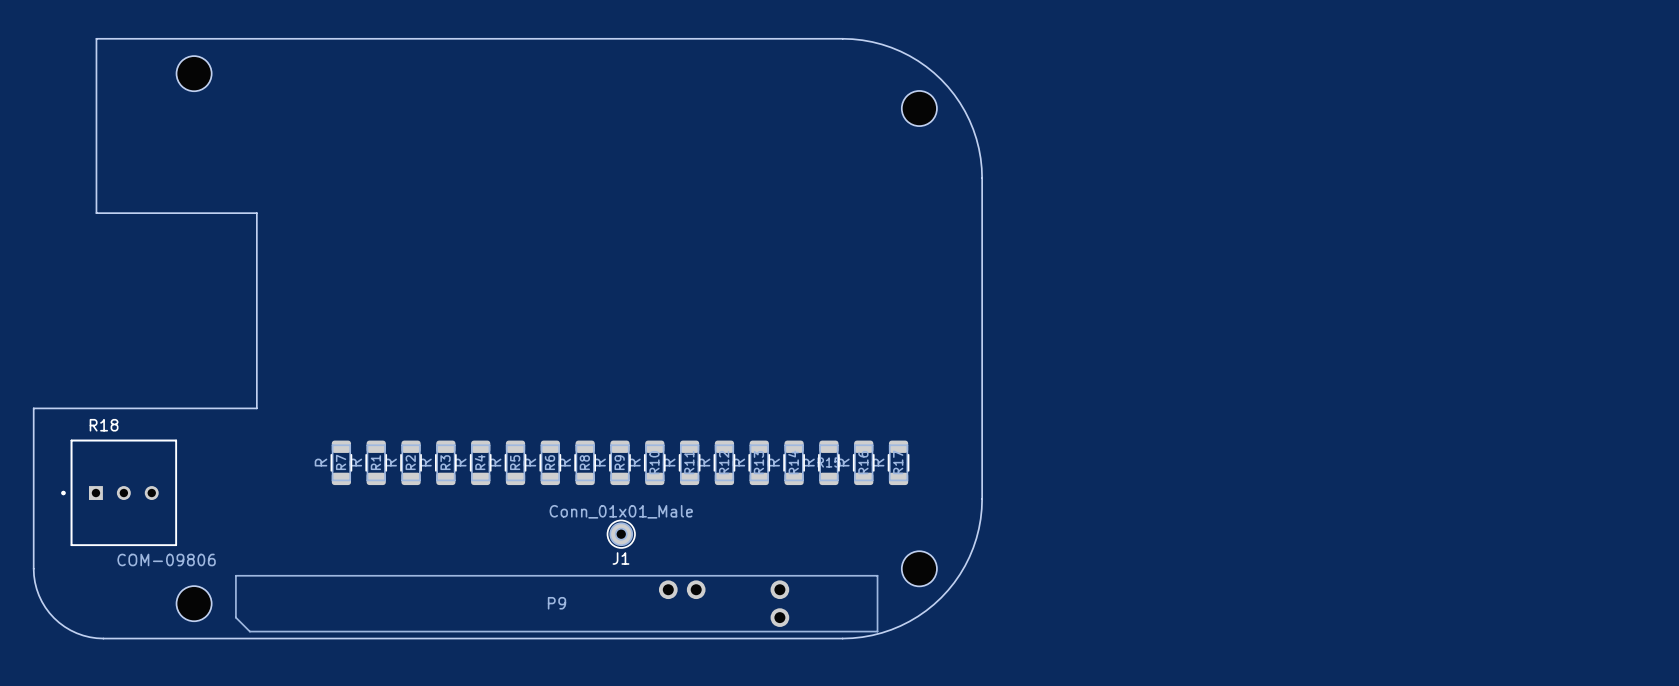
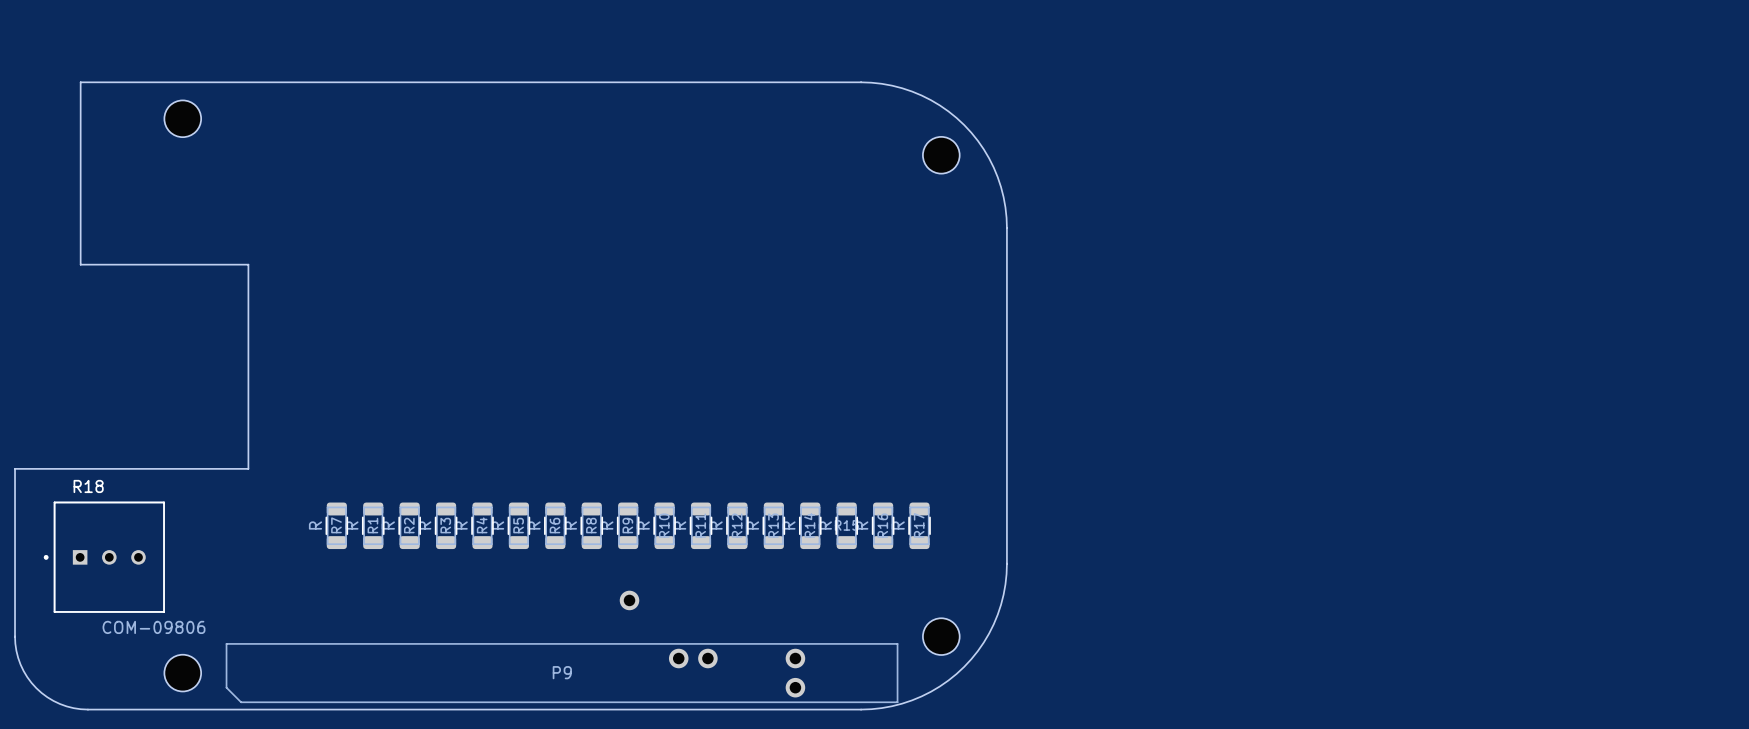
J1: Conn_01x01_Male (621, 534) -> none
part: none -> (629, 600)

